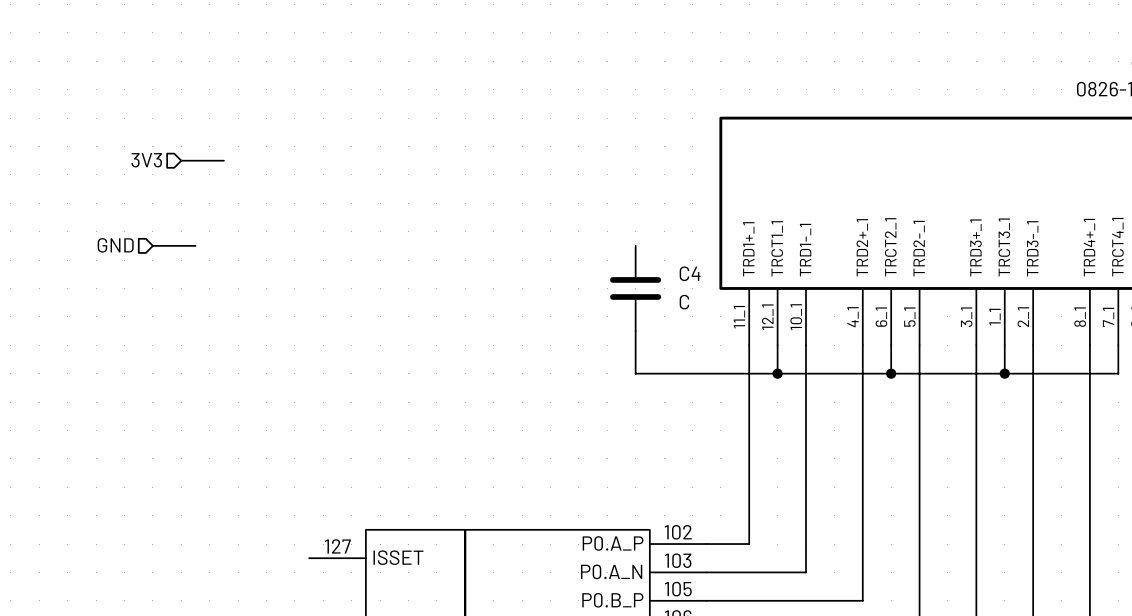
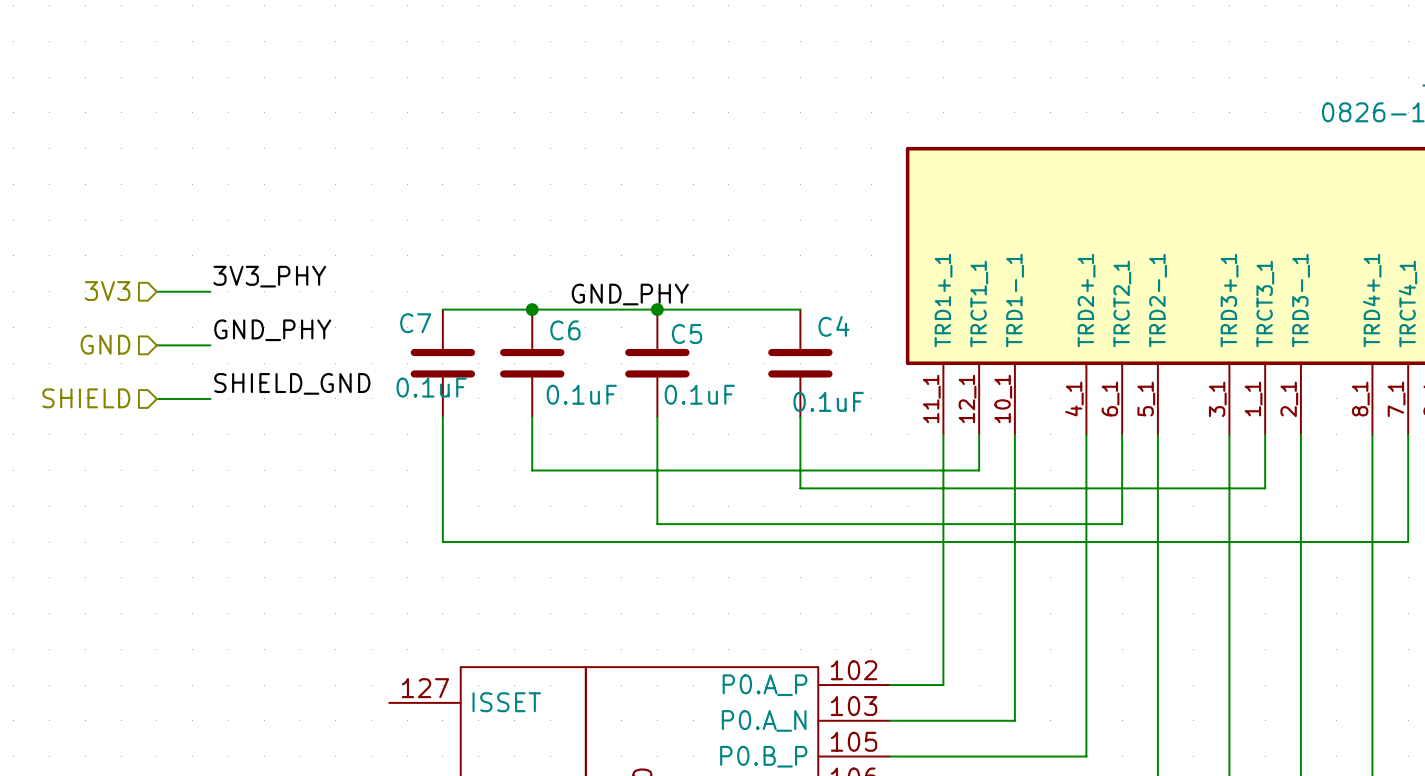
hierarchical label position: 3V3 (146, 160) -> 3V3 (107, 291)
wire: (181, 160) (223, 160) -> (156, 345) (210, 345)
label: none -> 3V3_PHY (269, 276)
label: none -> GND_PHY (630, 294)
hierarchical label position: GND (115, 245) -> GND (105, 344)
wire: (152, 245) (195, 245) -> (156, 291) (210, 291)
wire: none -> (442, 309) (800, 309)
junction: none -> (532, 309)
junction: none -> (657, 309)
label: none -> GND_PHY (272, 330)
C4 name position: C4 (690, 273) -> C4 (833, 326)
C7: none -> 0.1uF (442, 363)
C6: none -> 0.1uF (532, 363)
C5: none -> 0.1uF (657, 363)
C4 value: C (684, 302) -> 0.1uF (828, 401)
label: none -> SHIELD_GND (292, 383)
hierarchical label: none -> SHIELD (86, 398)
wire: none -> (156, 398) (210, 398)
wire: none -> (532, 416) (532, 470) (800, 470) (800, 488) (1265, 488) (1265, 470)
wire: none -> (657, 416) (657, 524) (1122, 524) (1122, 470)
wire: (777, 373) (1118, 373) -> (442, 416) (442, 542) (1408, 542) (1408, 470)
junction: (777, 373) -> none
junction: (891, 373) -> none
junction: (1004, 373) -> none

